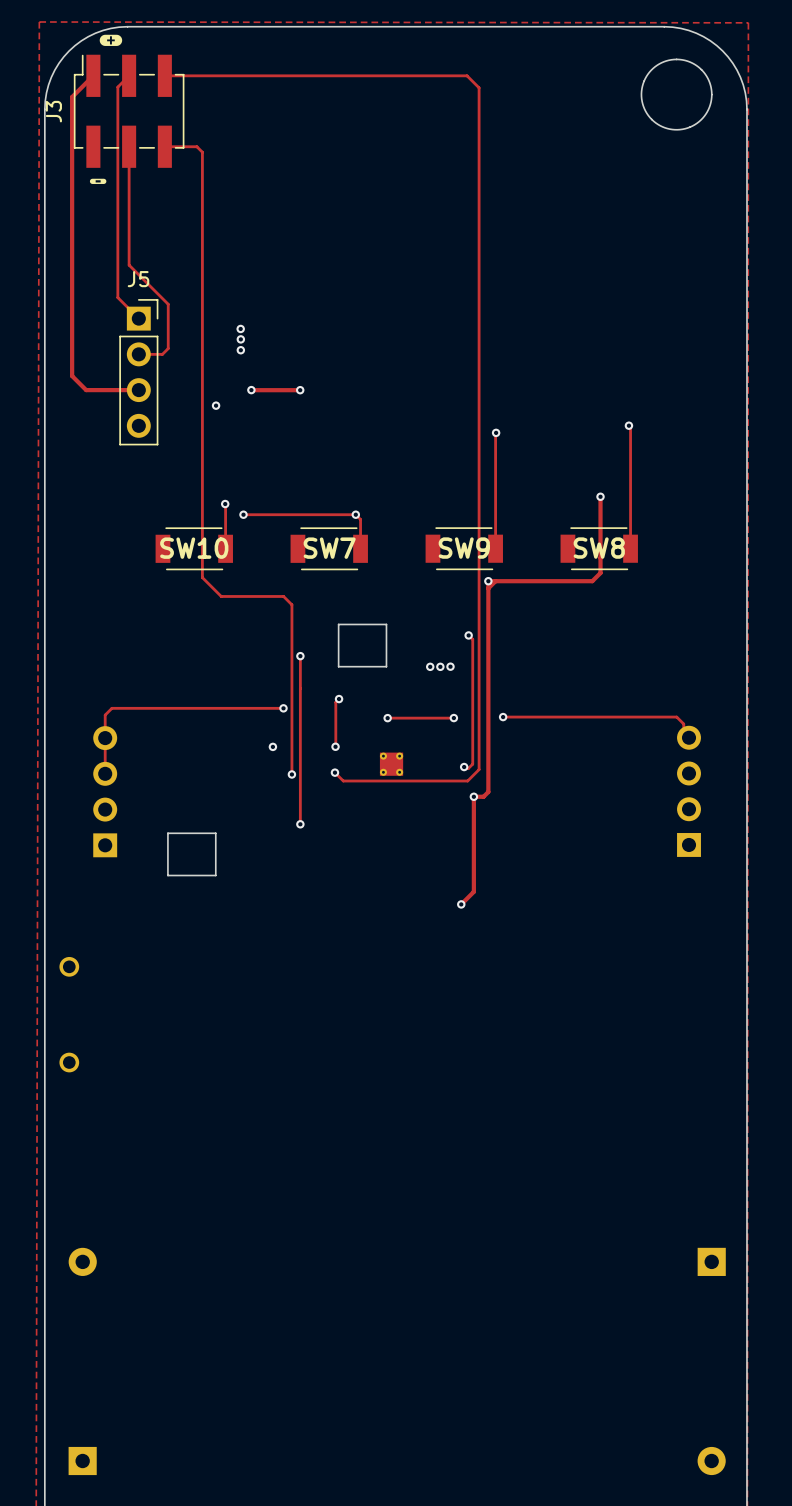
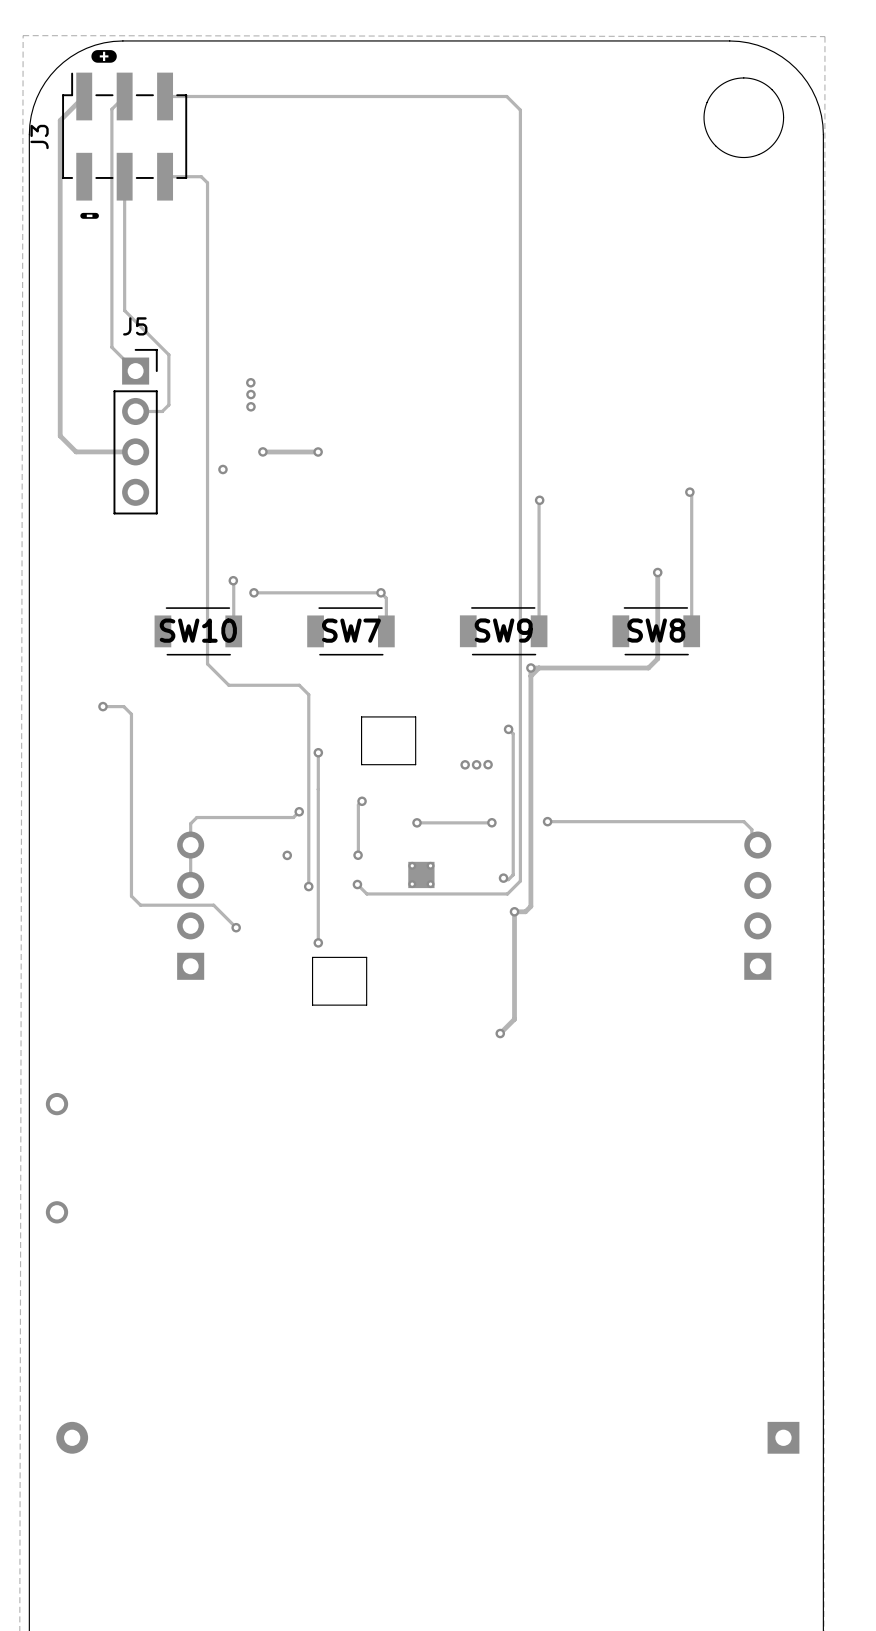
track: none -> (102, 706) (123, 706) (131, 714) (131, 896) (140, 905) (213, 905) (236, 927)
via: none -> (102, 706)
track: (283, 708) (111, 708) (105, 715) (105, 770) -> (299, 811) (293, 817) (196, 817) (190, 823) (190, 885)
part position: (105, 791) -> (190, 905)
via: none -> (236, 927)
part position: (191, 854) -> (339, 981)

